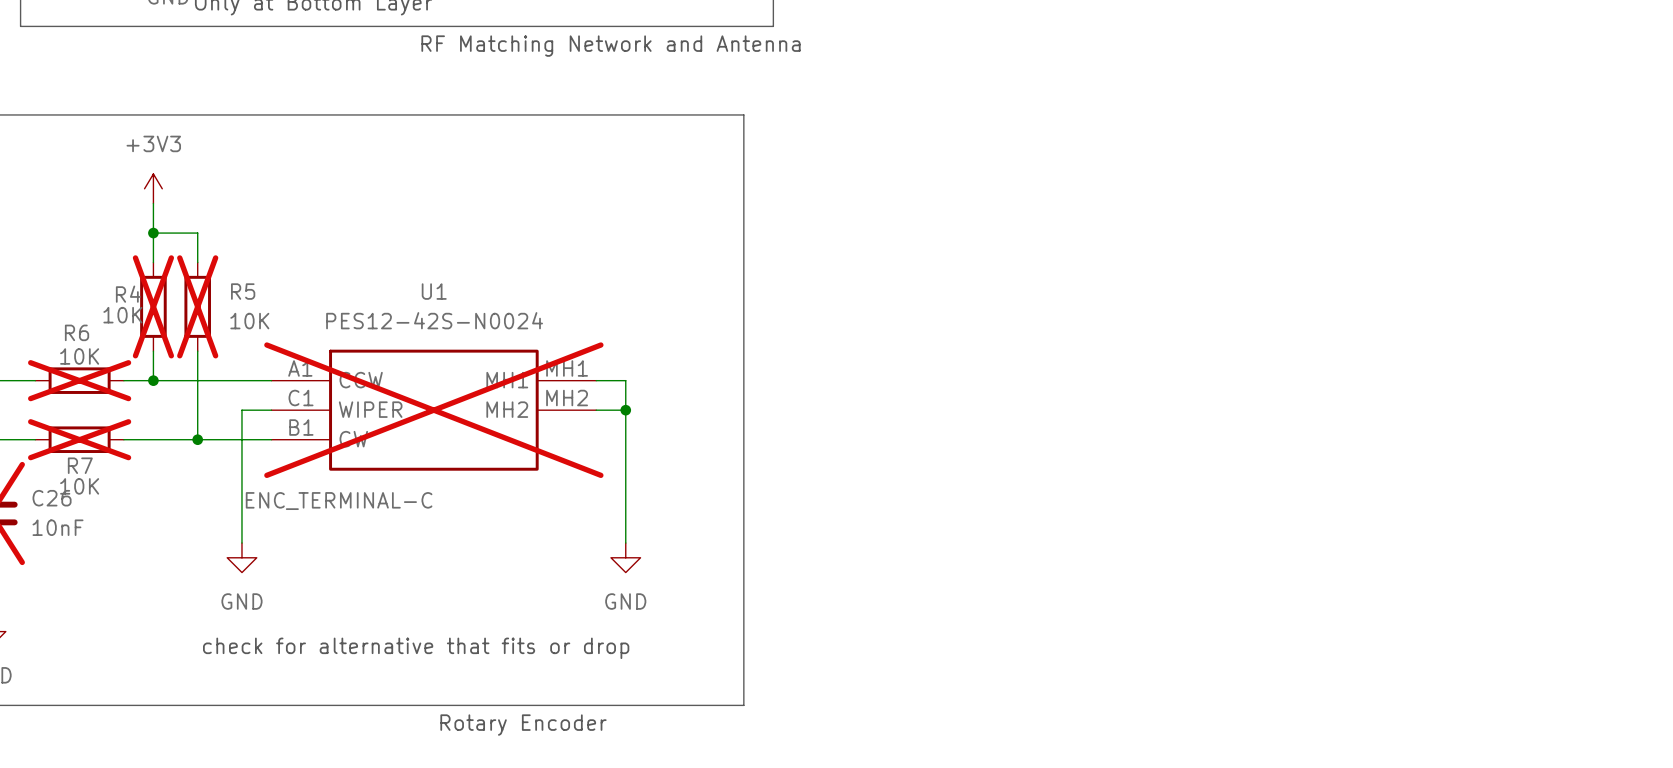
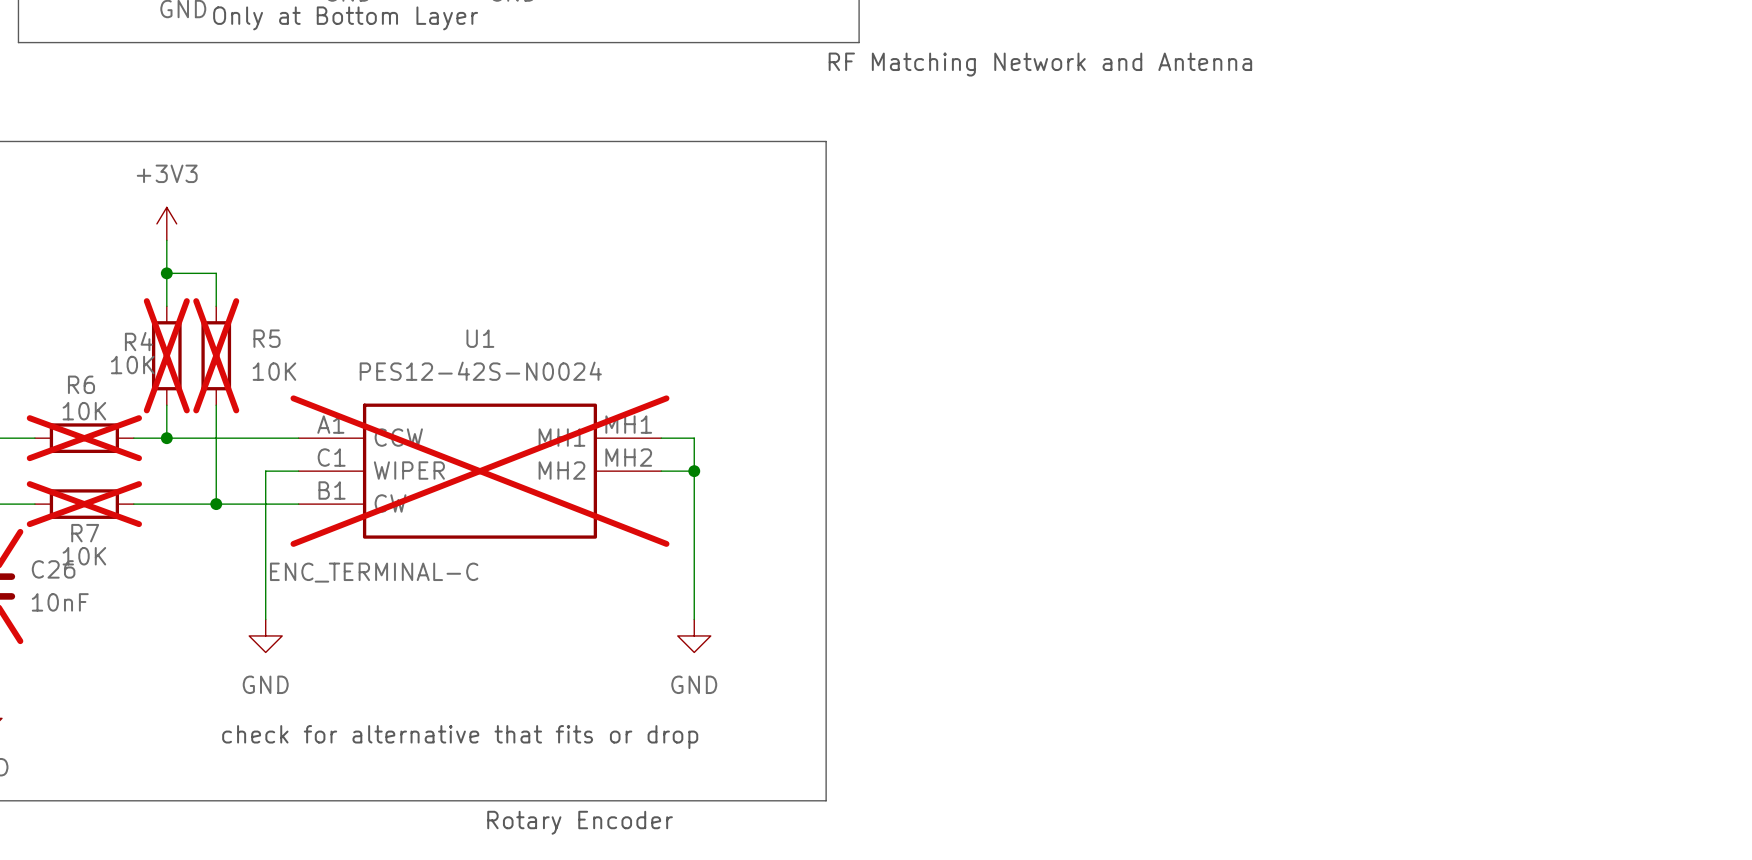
text: RF Matching Network and Antenna (611, 46) -> none
text: none -> RF Matching Network and Antenna (1040, 64)

